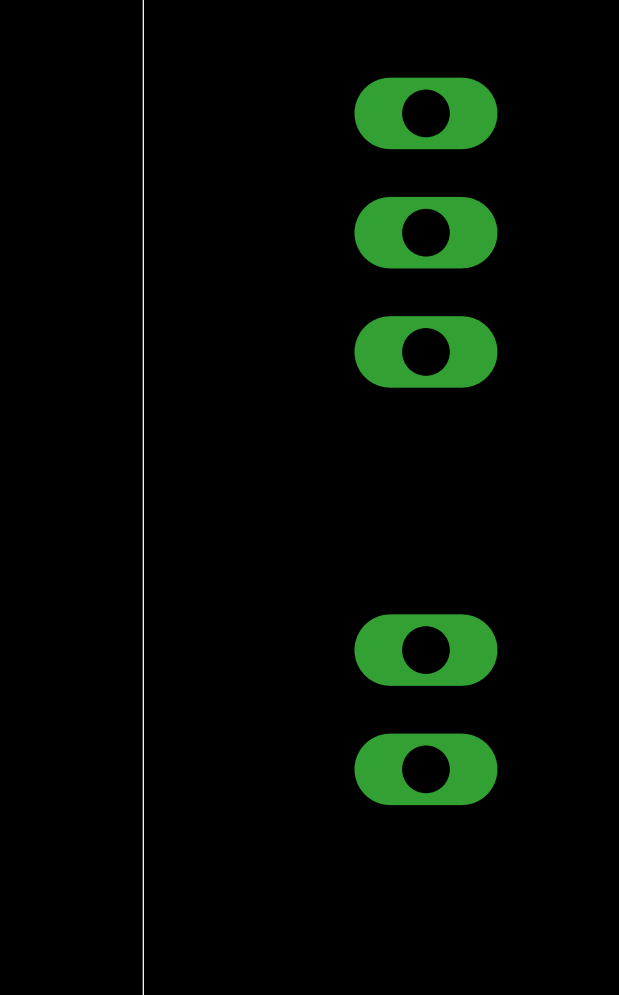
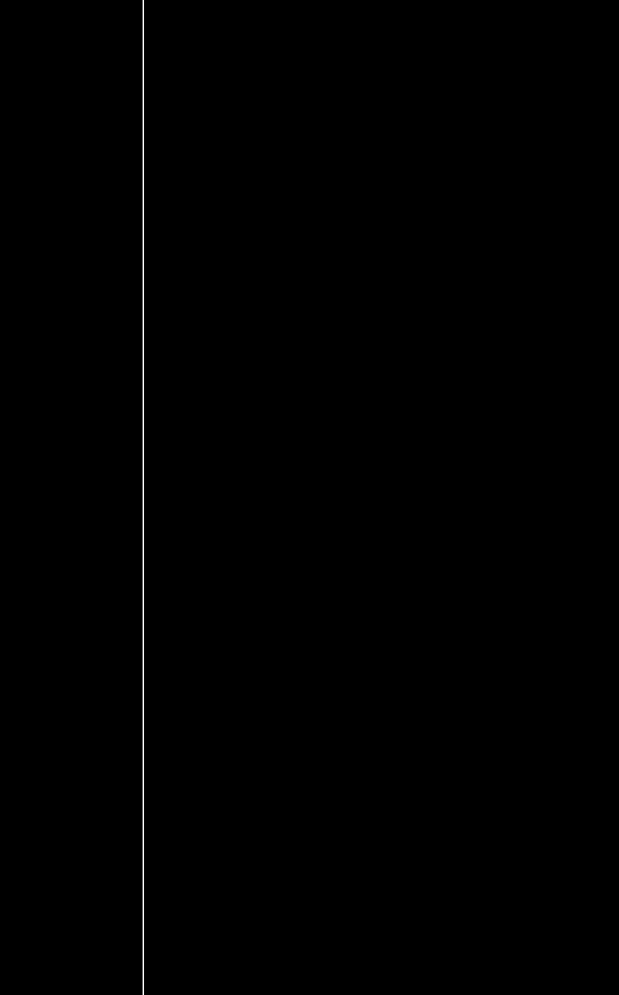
part: (425, 232) -> none
part: (425, 709) -> none

